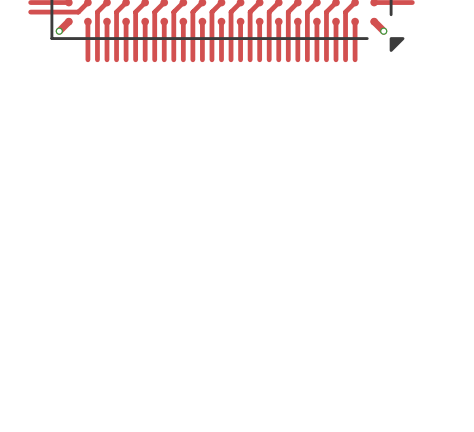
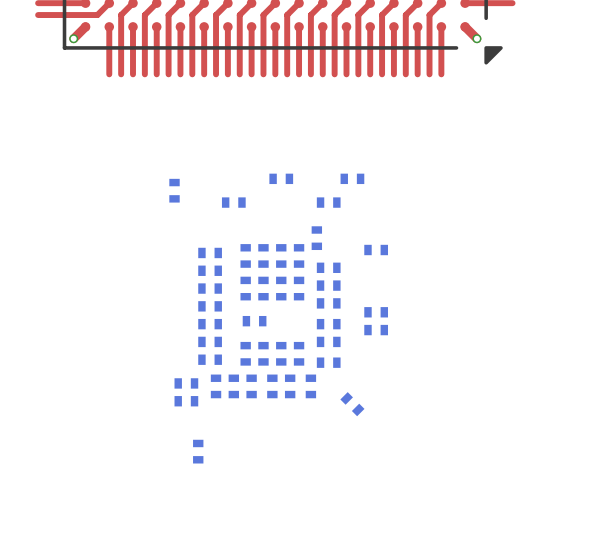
part: none -> (281, 178)
part: none -> (352, 178)
part: none -> (174, 190)
part: none -> (233, 202)
part: none -> (328, 202)
part: none -> (316, 238)
part: none -> (376, 250)
part: none -> (210, 252)
part: none -> (245, 255)
part: none -> (263, 255)
part: none -> (281, 255)
part: none -> (299, 255)
part: none -> (328, 267)
part: none -> (210, 270)
part: none -> (328, 285)
part: none -> (210, 288)
part: none -> (245, 288)
part: none -> (263, 288)
part: none -> (281, 288)
part: none -> (299, 288)
part: none -> (328, 303)
part: none -> (210, 306)
part: none -> (376, 312)
part: none -> (254, 321)
part: none -> (210, 324)
part: none -> (328, 324)
part: none -> (376, 330)
part: none -> (210, 341)
part: none -> (328, 341)
part: none -> (245, 353)
part: none -> (263, 353)
part: none -> (281, 353)
part: none -> (299, 353)
part: none -> (210, 359)
part: none -> (328, 362)
part: none -> (186, 383)
part: none -> (216, 386)
part: none -> (233, 386)
part: none -> (251, 386)
part: none -> (272, 386)
part: none -> (290, 386)
part: none -> (310, 386)
part: none -> (186, 401)
part: none -> (352, 404)
part: none -> (198, 451)

